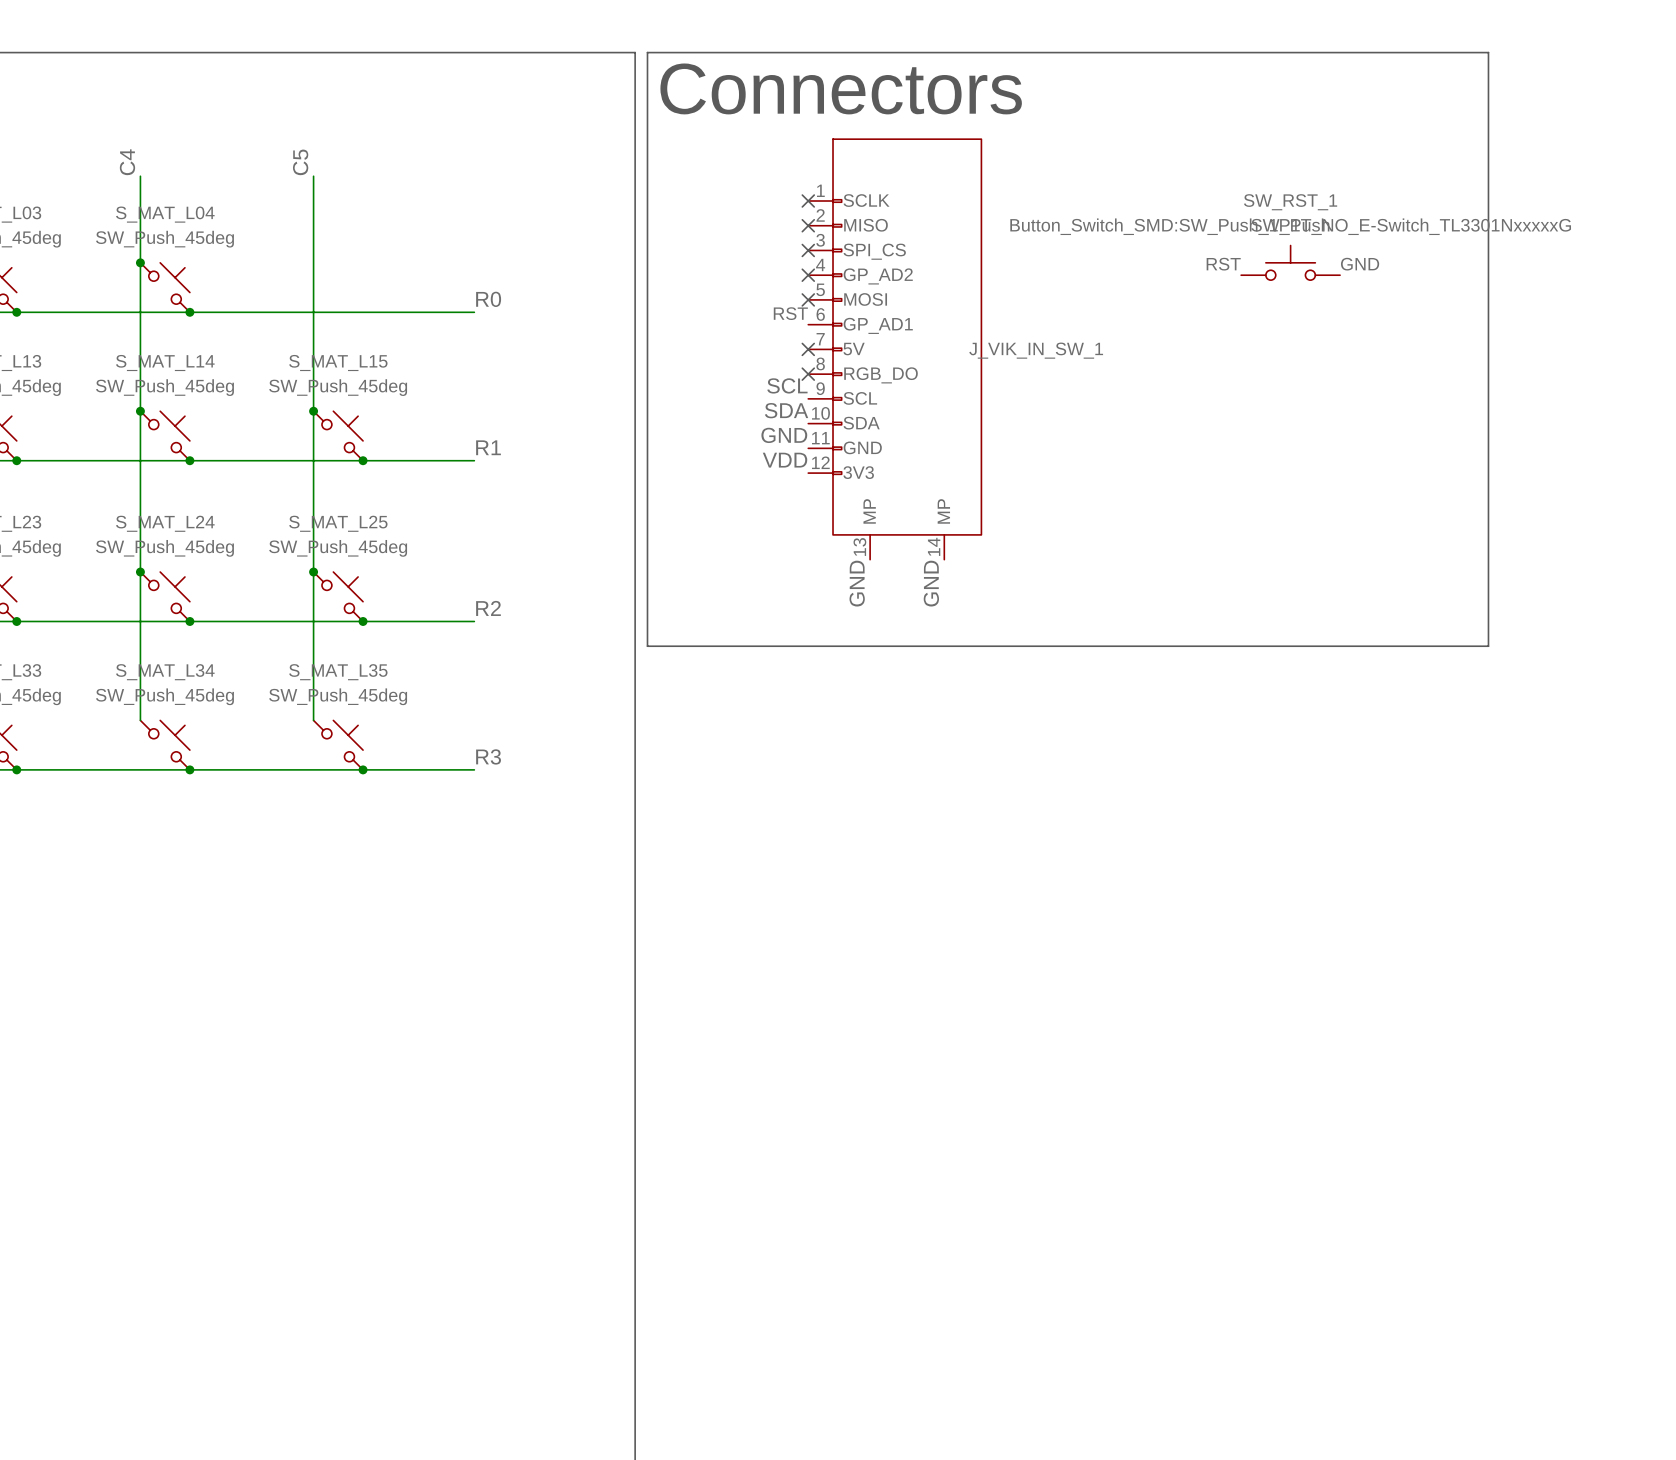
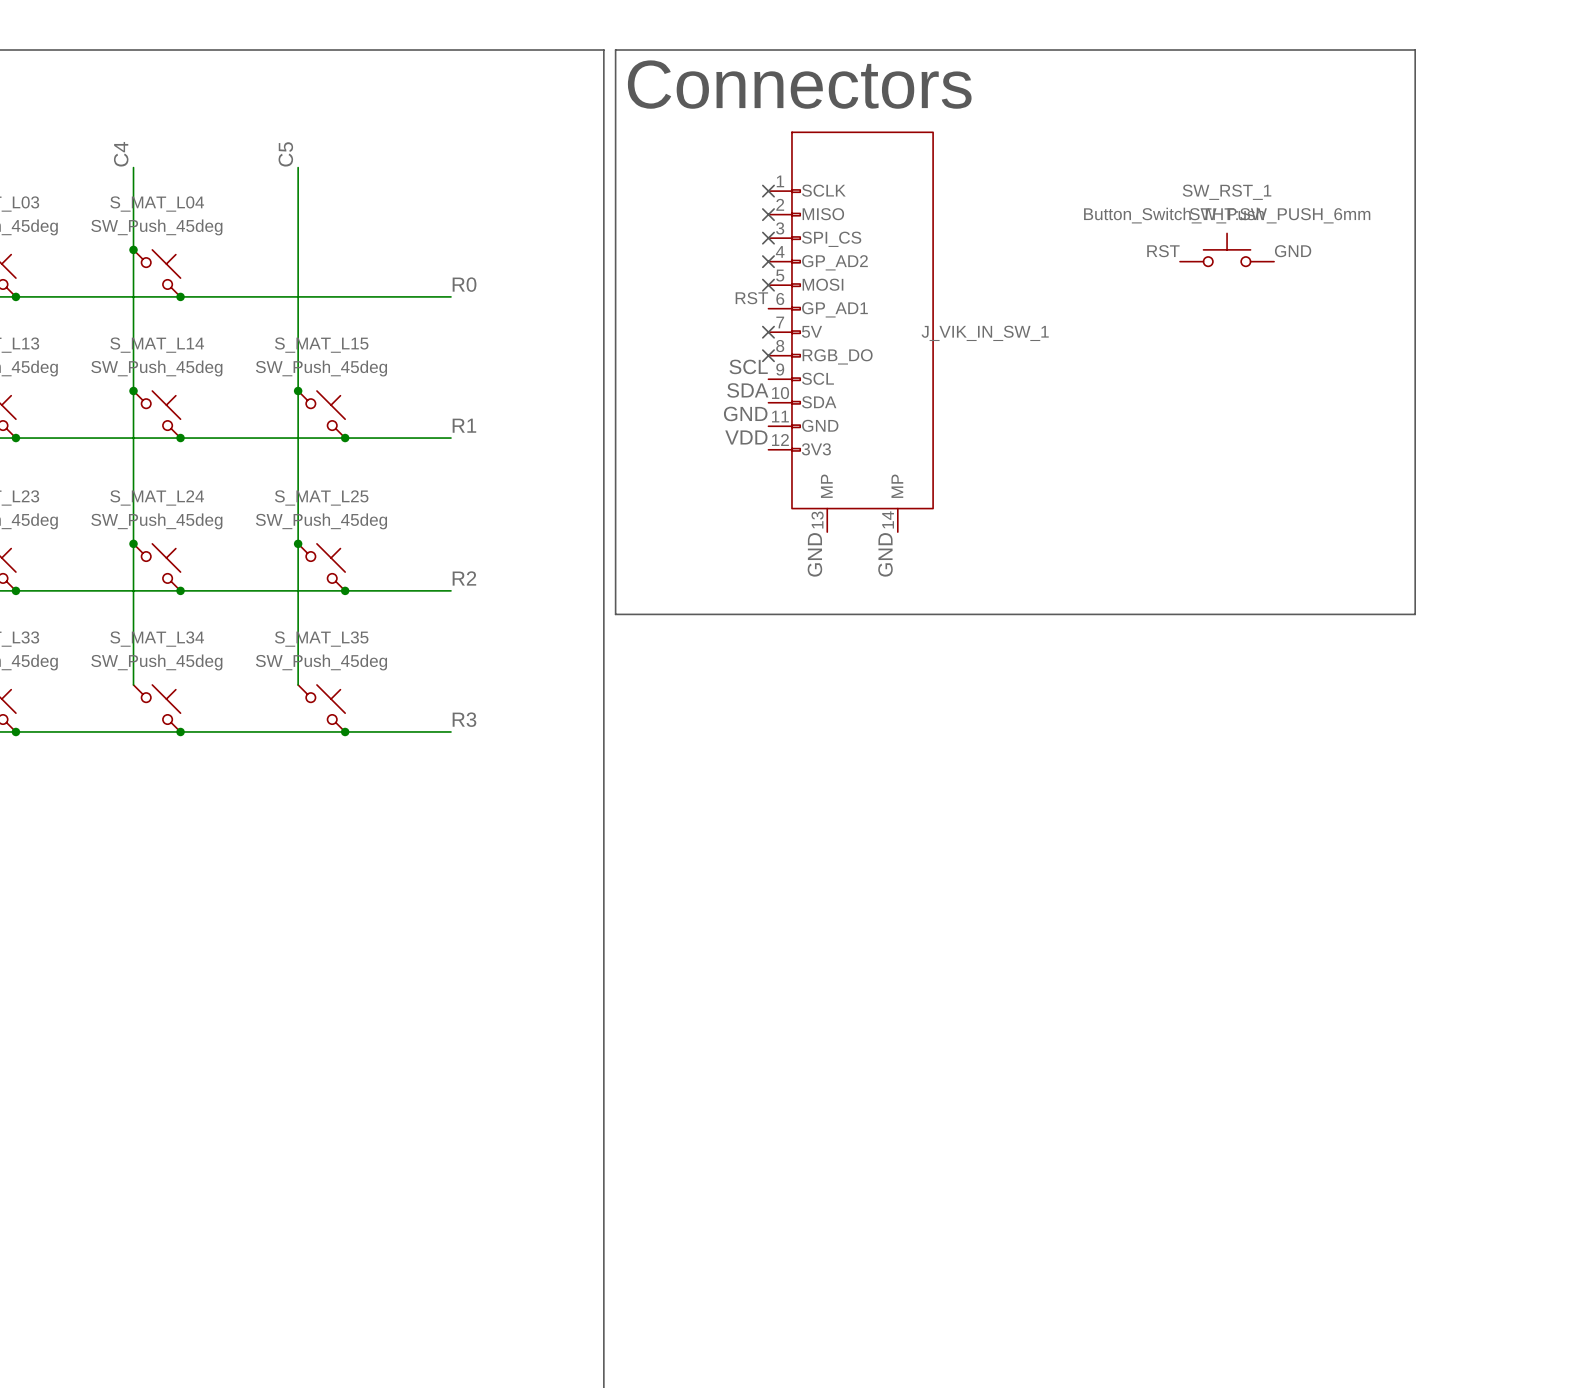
SW_RST_1 text: Button_Switch_SMD:SW_Push_1P1T_NO_E-Switch_TL3301NxxxxxG (1290, 226) -> Button_Switch_THT:SW_PUSH_6mm (1227, 215)

